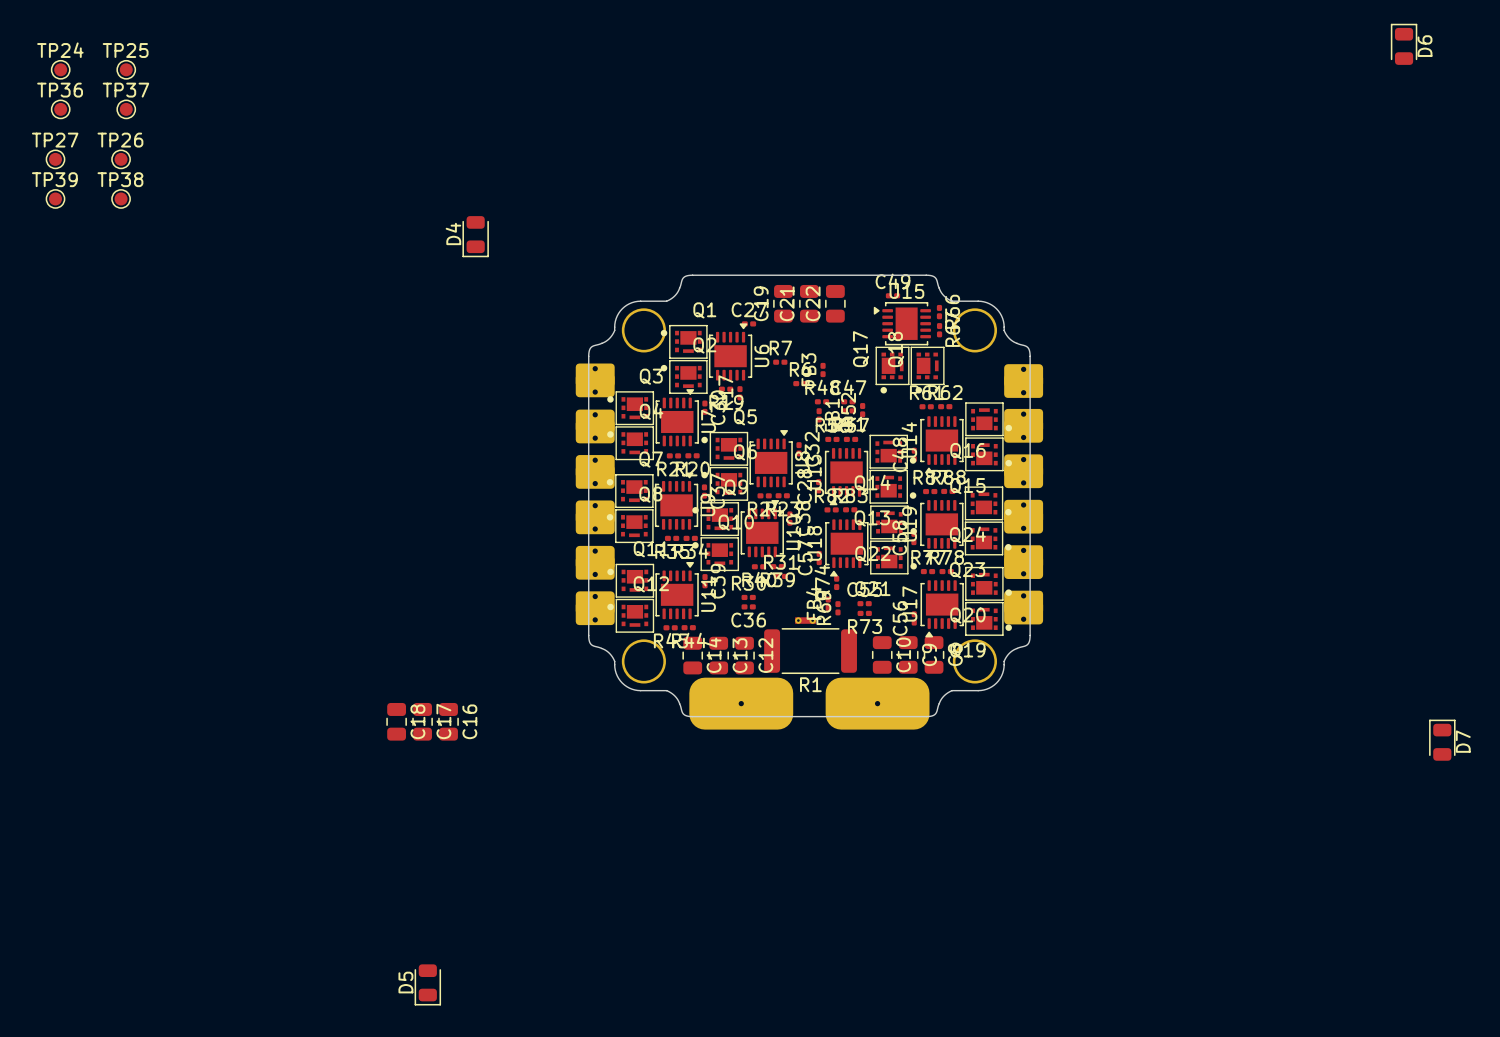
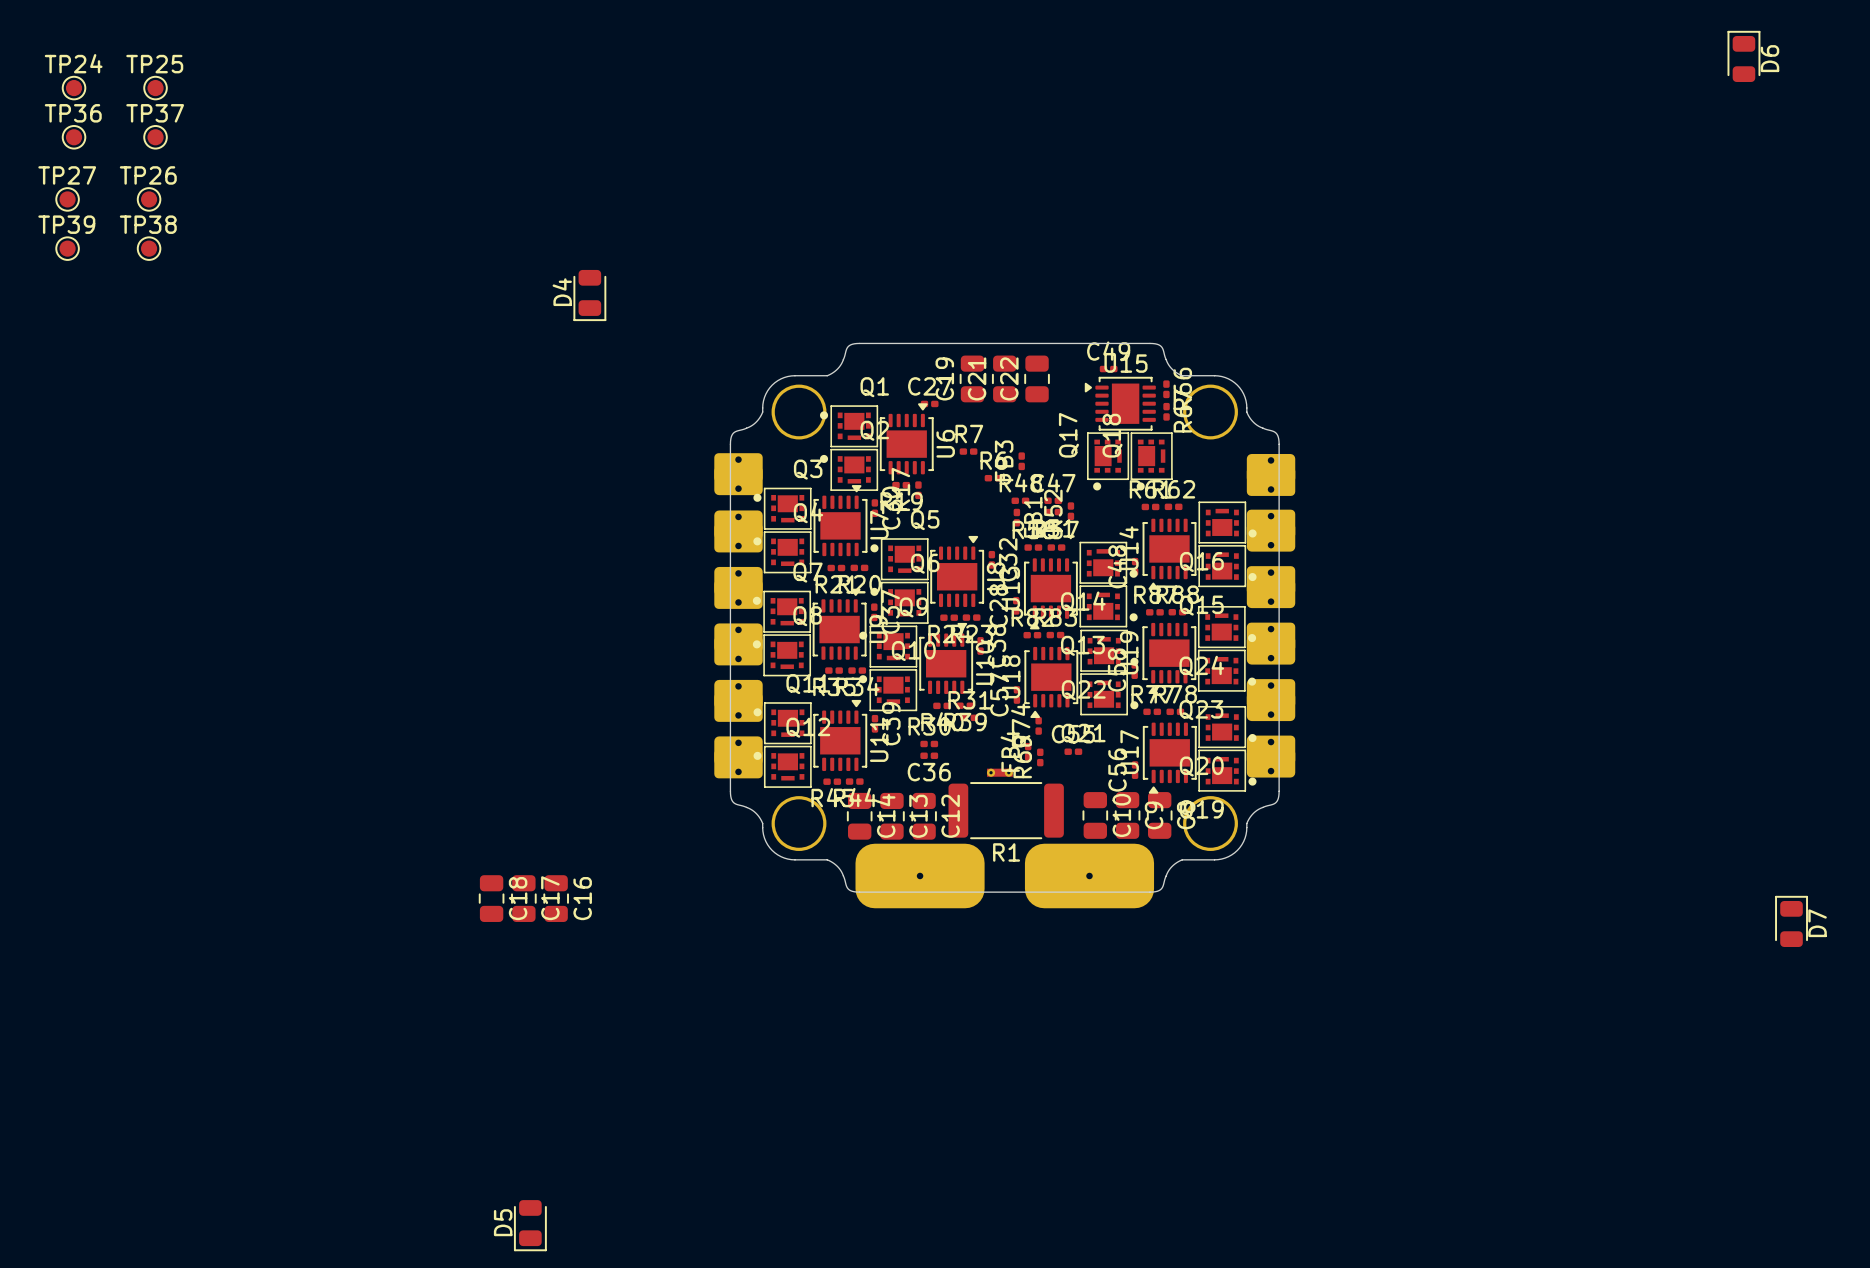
R73: (864, 613) -> none

